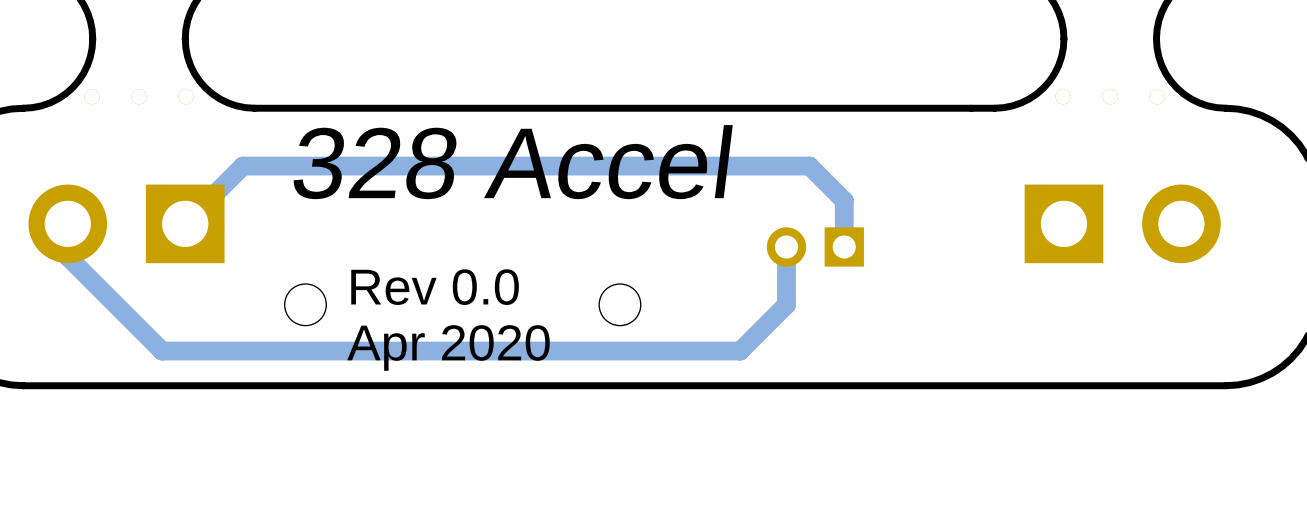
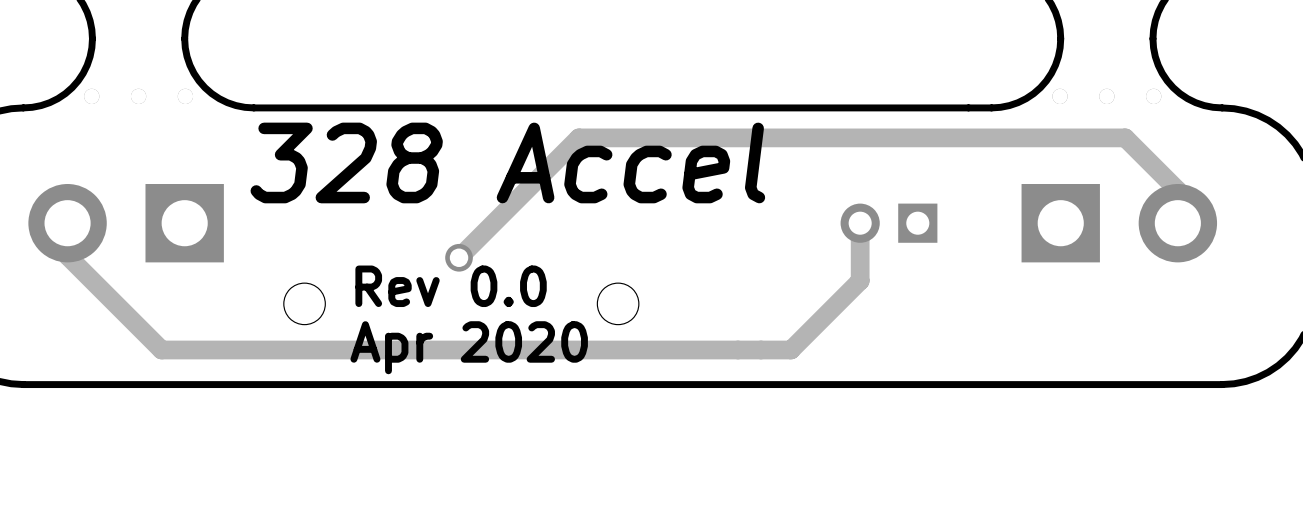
track: (185, 223) (243, 166) (809, 166) (844, 200) (844, 246) -> none
track: none -> (1177, 223) (1177, 190) (1125, 137) (578, 137) (459, 257)
track: (786, 246) (786, 304) (740, 351) -> (860, 223) (860, 280) (791, 349) (737, 349)
part position: (815, 246) -> (888, 223)
via: none -> (459, 257)

